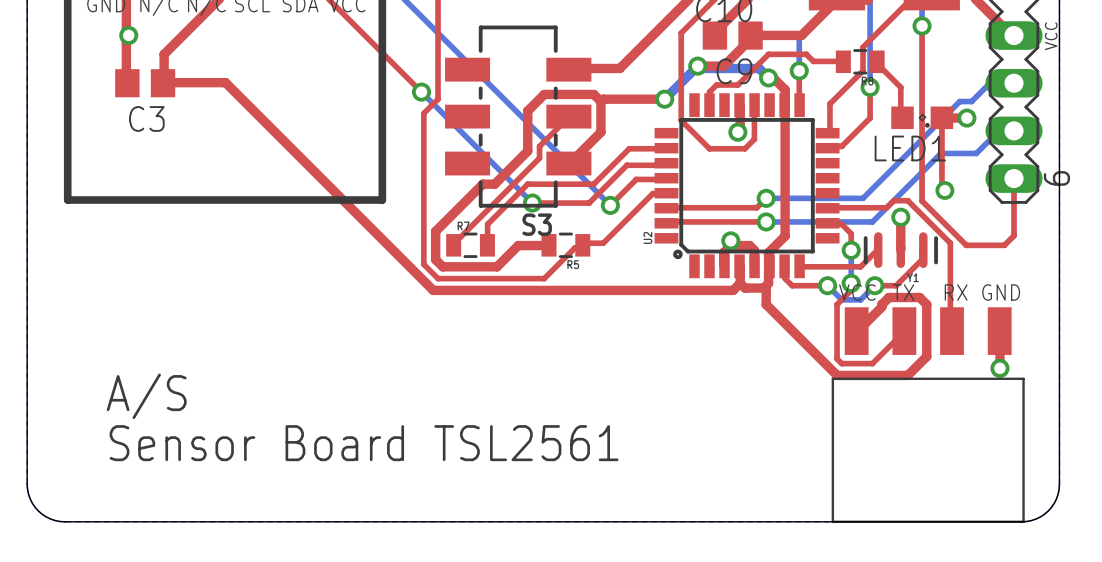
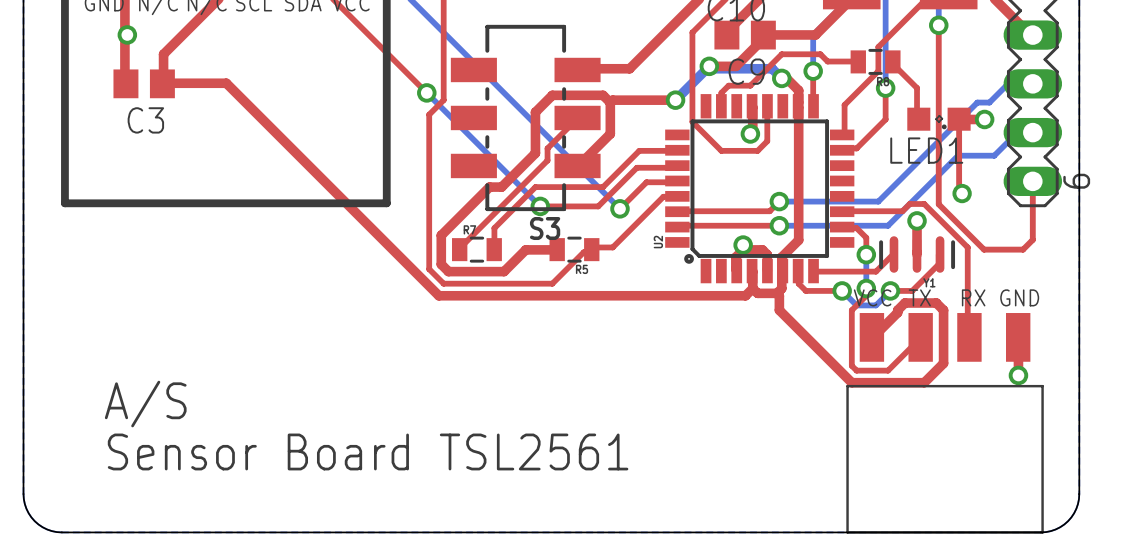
text: VCC (1051, 36) -> none

